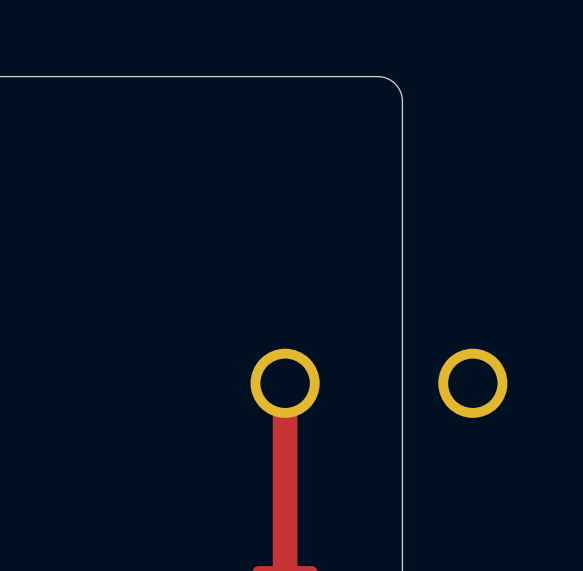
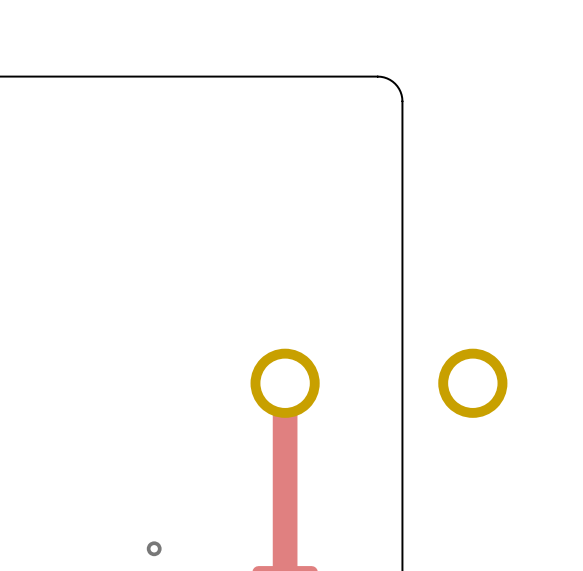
via: none -> (154, 548)

